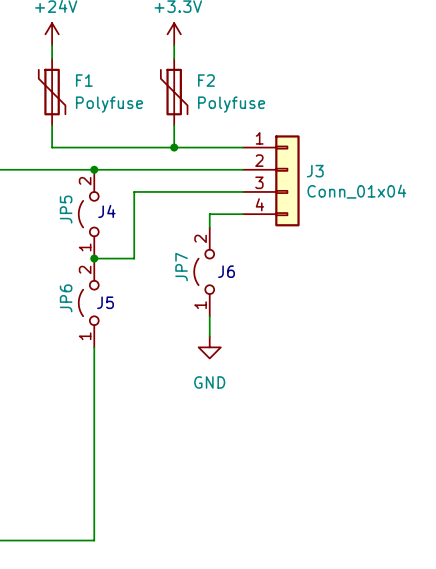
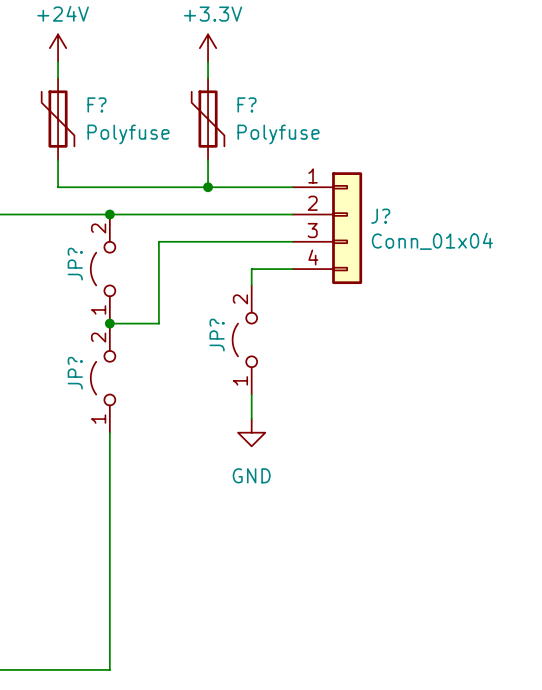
F1 name: F1 (84, 80) -> F? (97, 104)
F2 name: F2 (206, 80) -> F? (247, 104)
J3 name: J3 (315, 171) -> J? (380, 216)
JP5 name: JP5 (66, 209) -> JP? (75, 264)
text: J4 (106, 211) -> none
JP7 name: JP7 (181, 267) -> JP? (217, 334)
text: J6 (226, 271) -> none
JP6 name: JP6 (66, 298) -> JP? (75, 373)
text: J5 (105, 302) -> none

